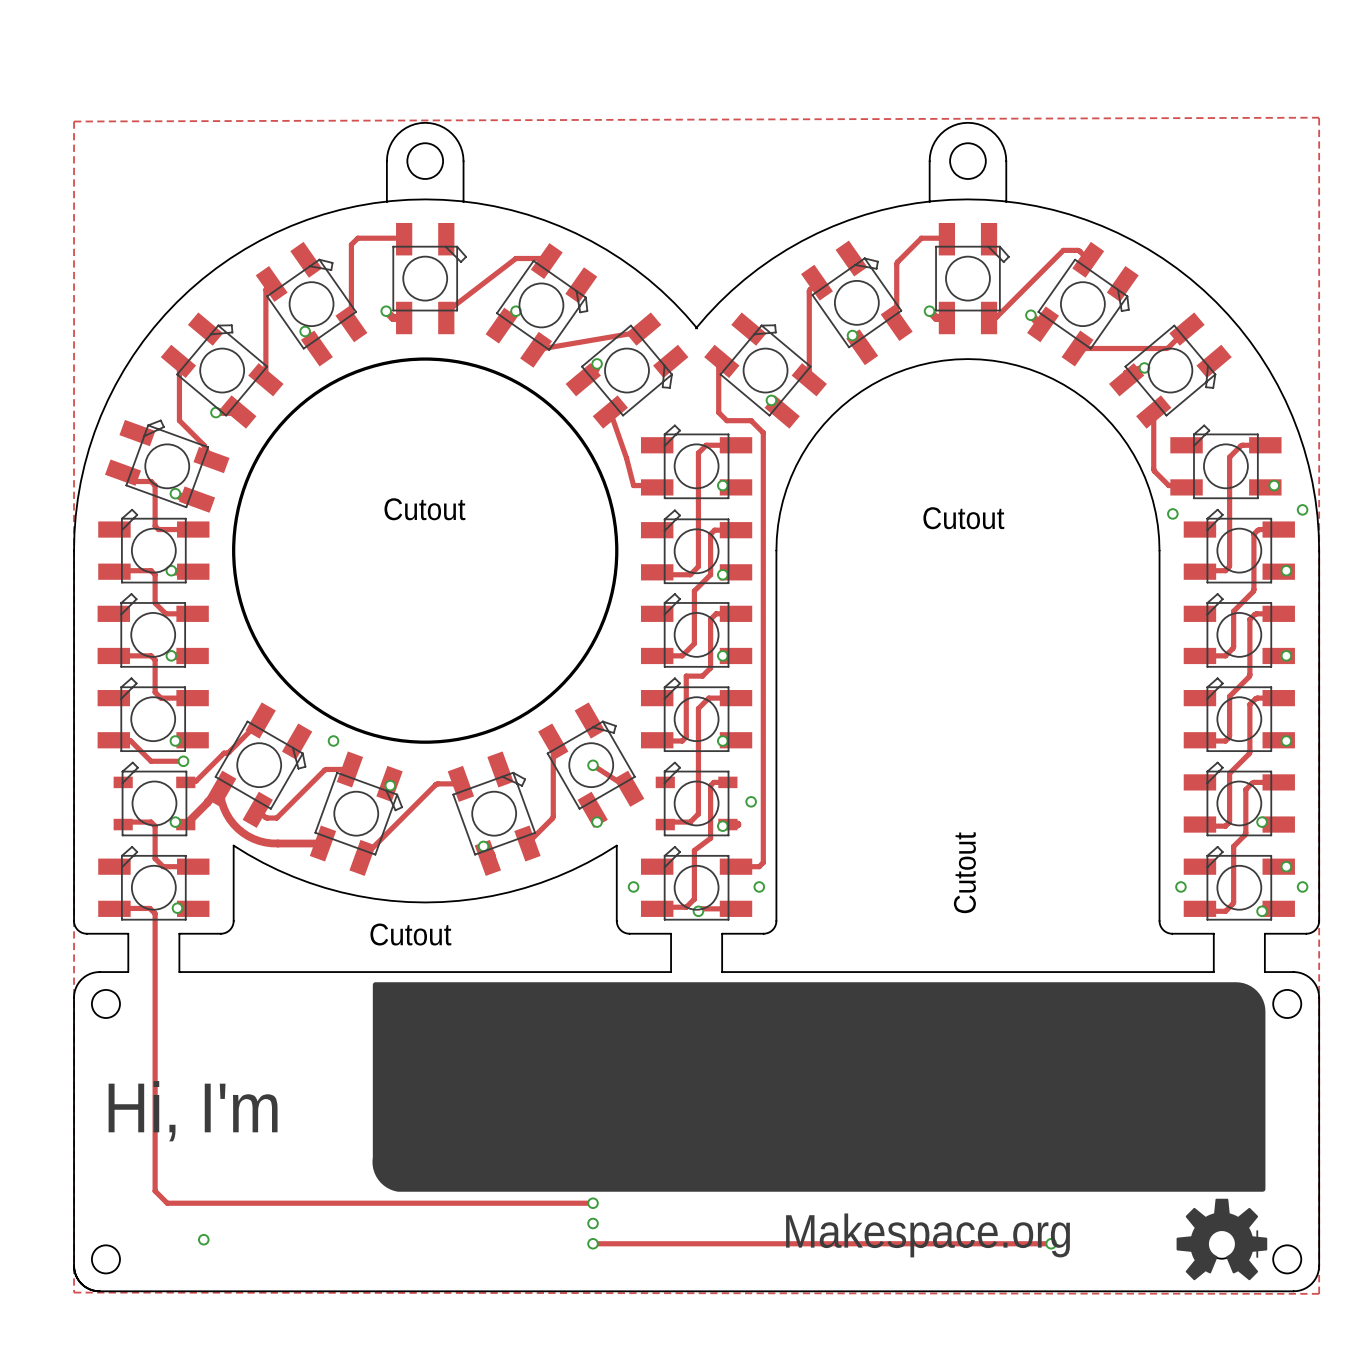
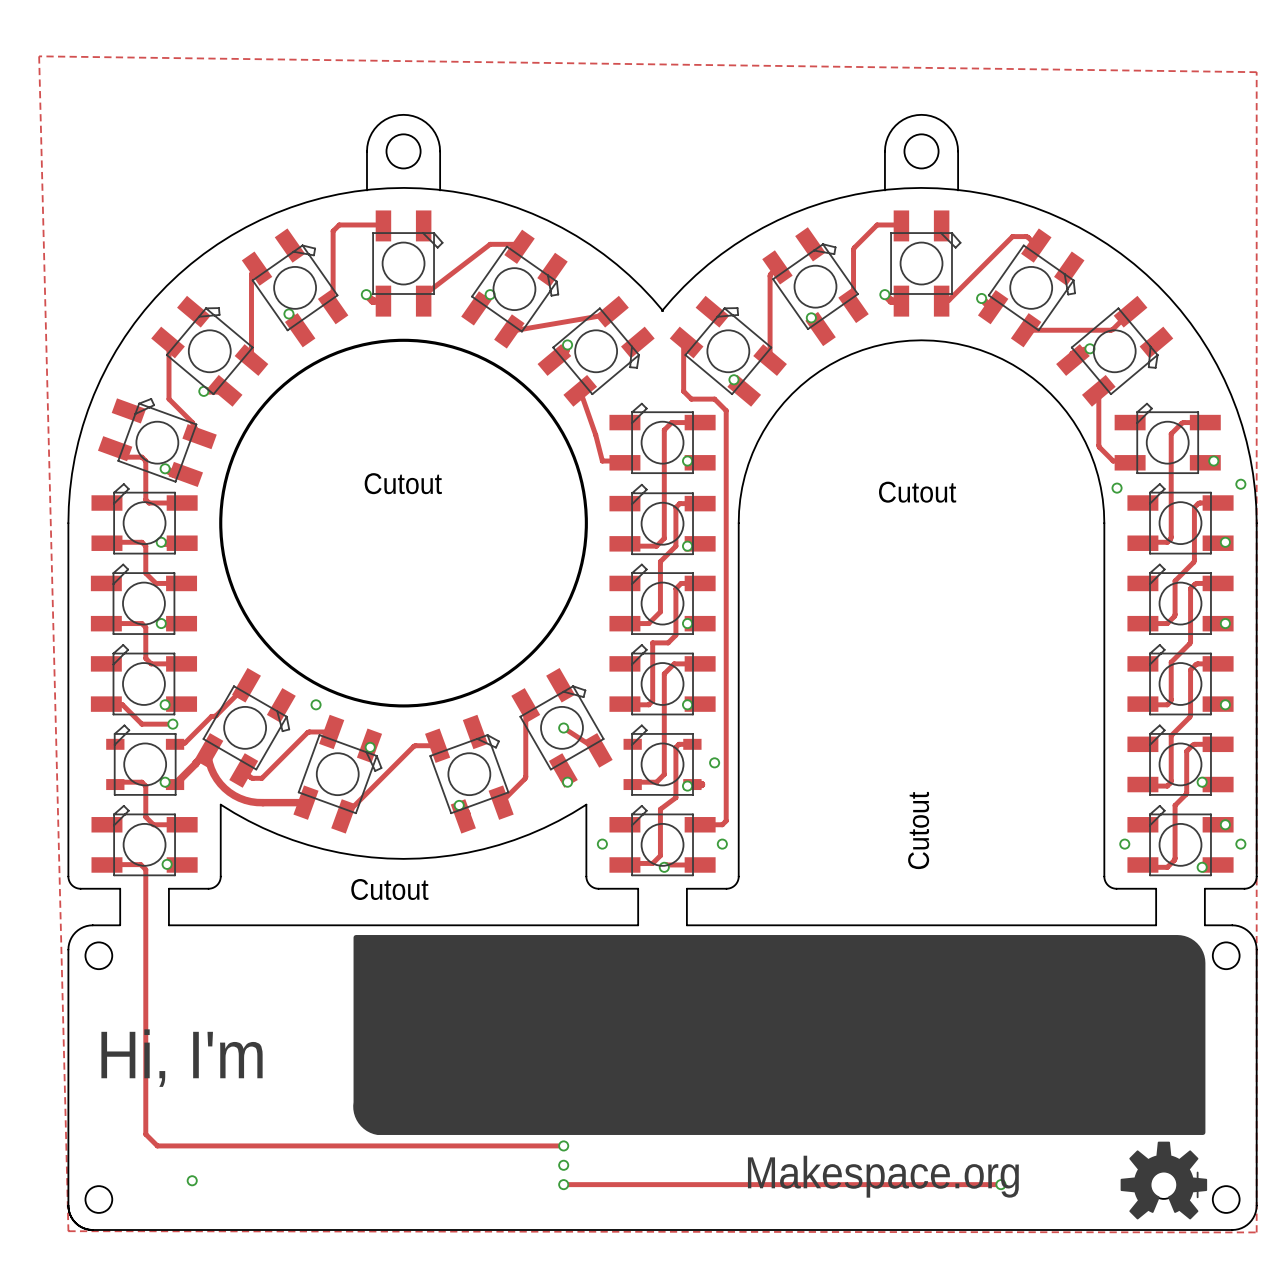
zone outline: (1319, 117) (74, 121) (74, 1291) -> (1256, 109) (1256, 72) (39, 56) (68, 1229)

